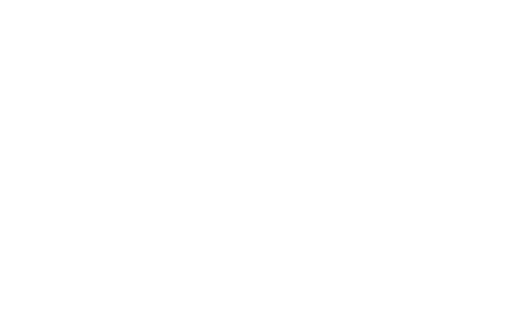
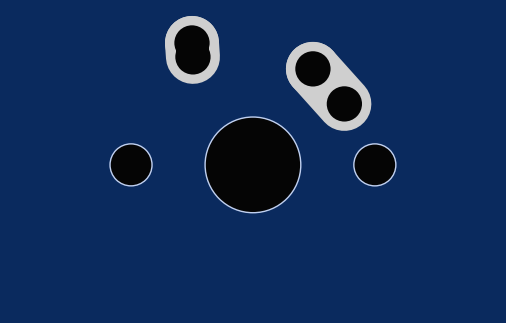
part: none -> (252, 114)

